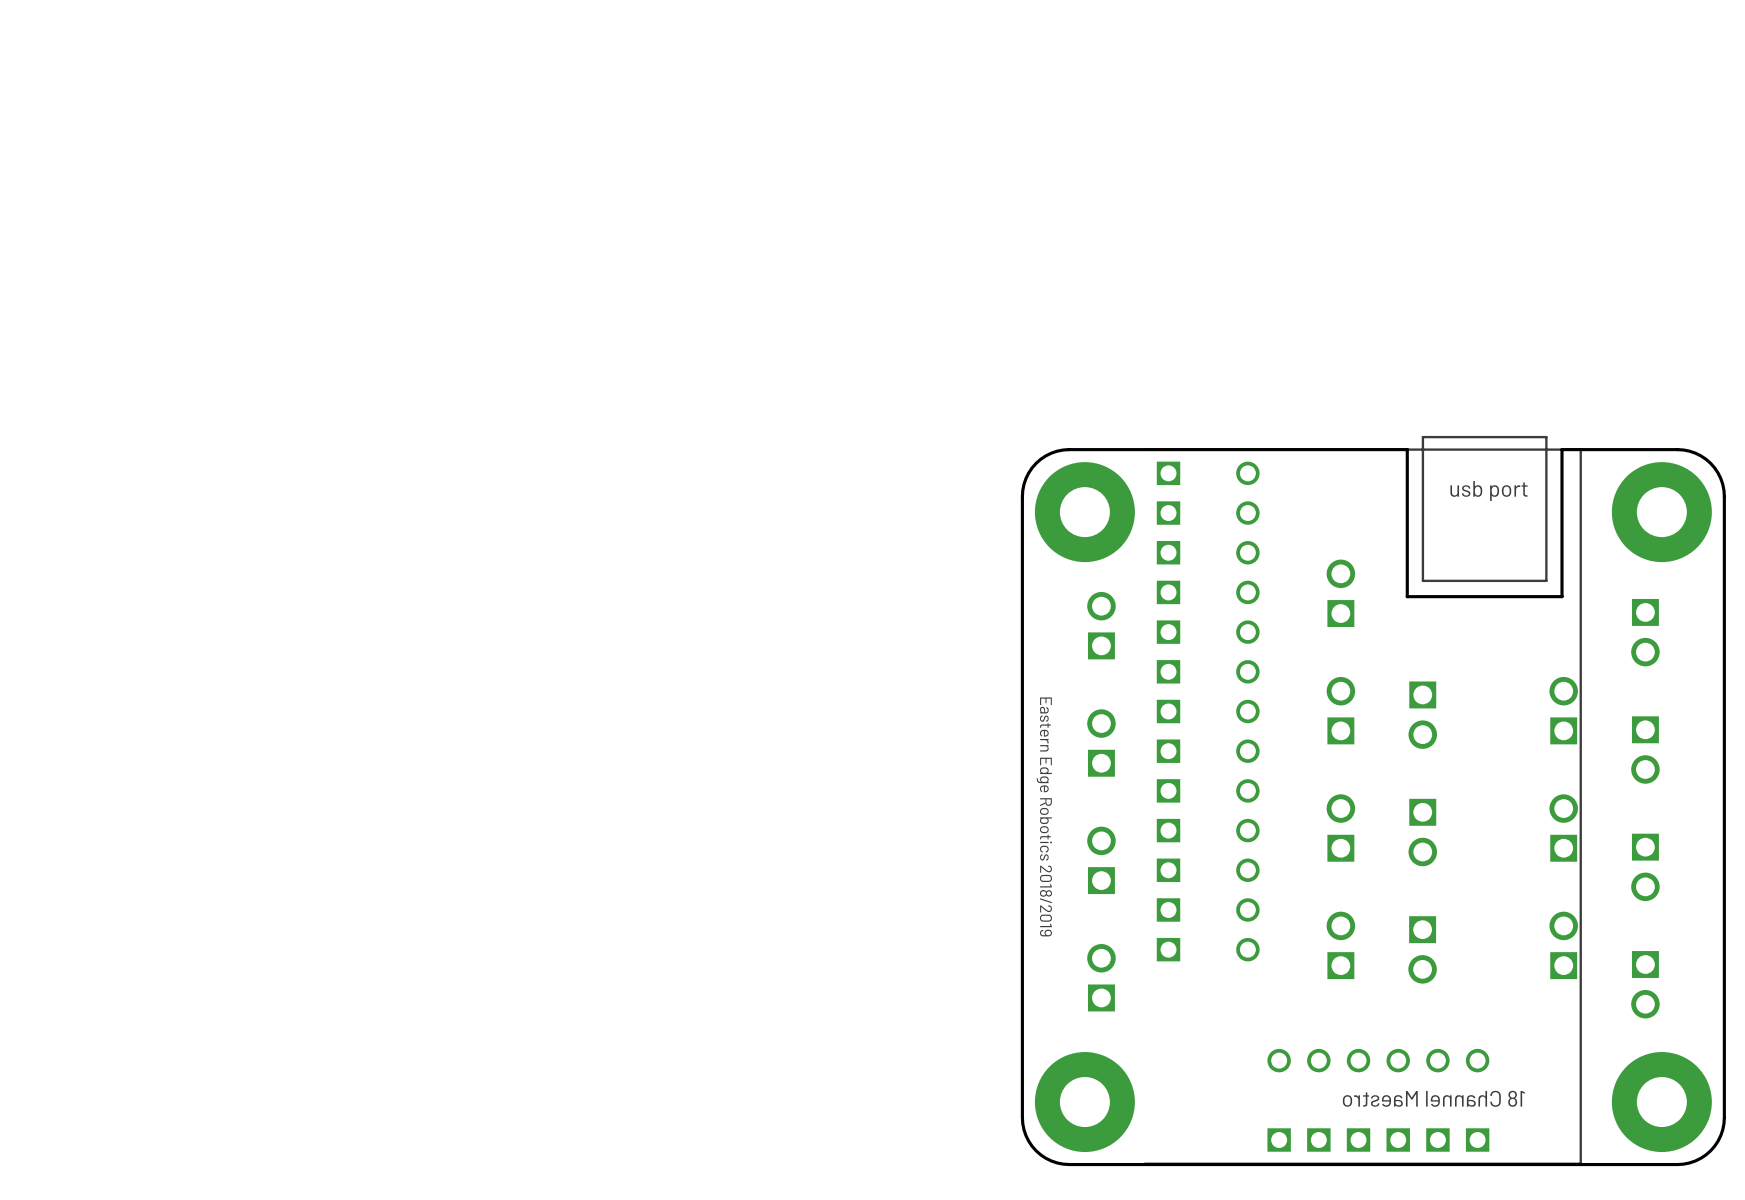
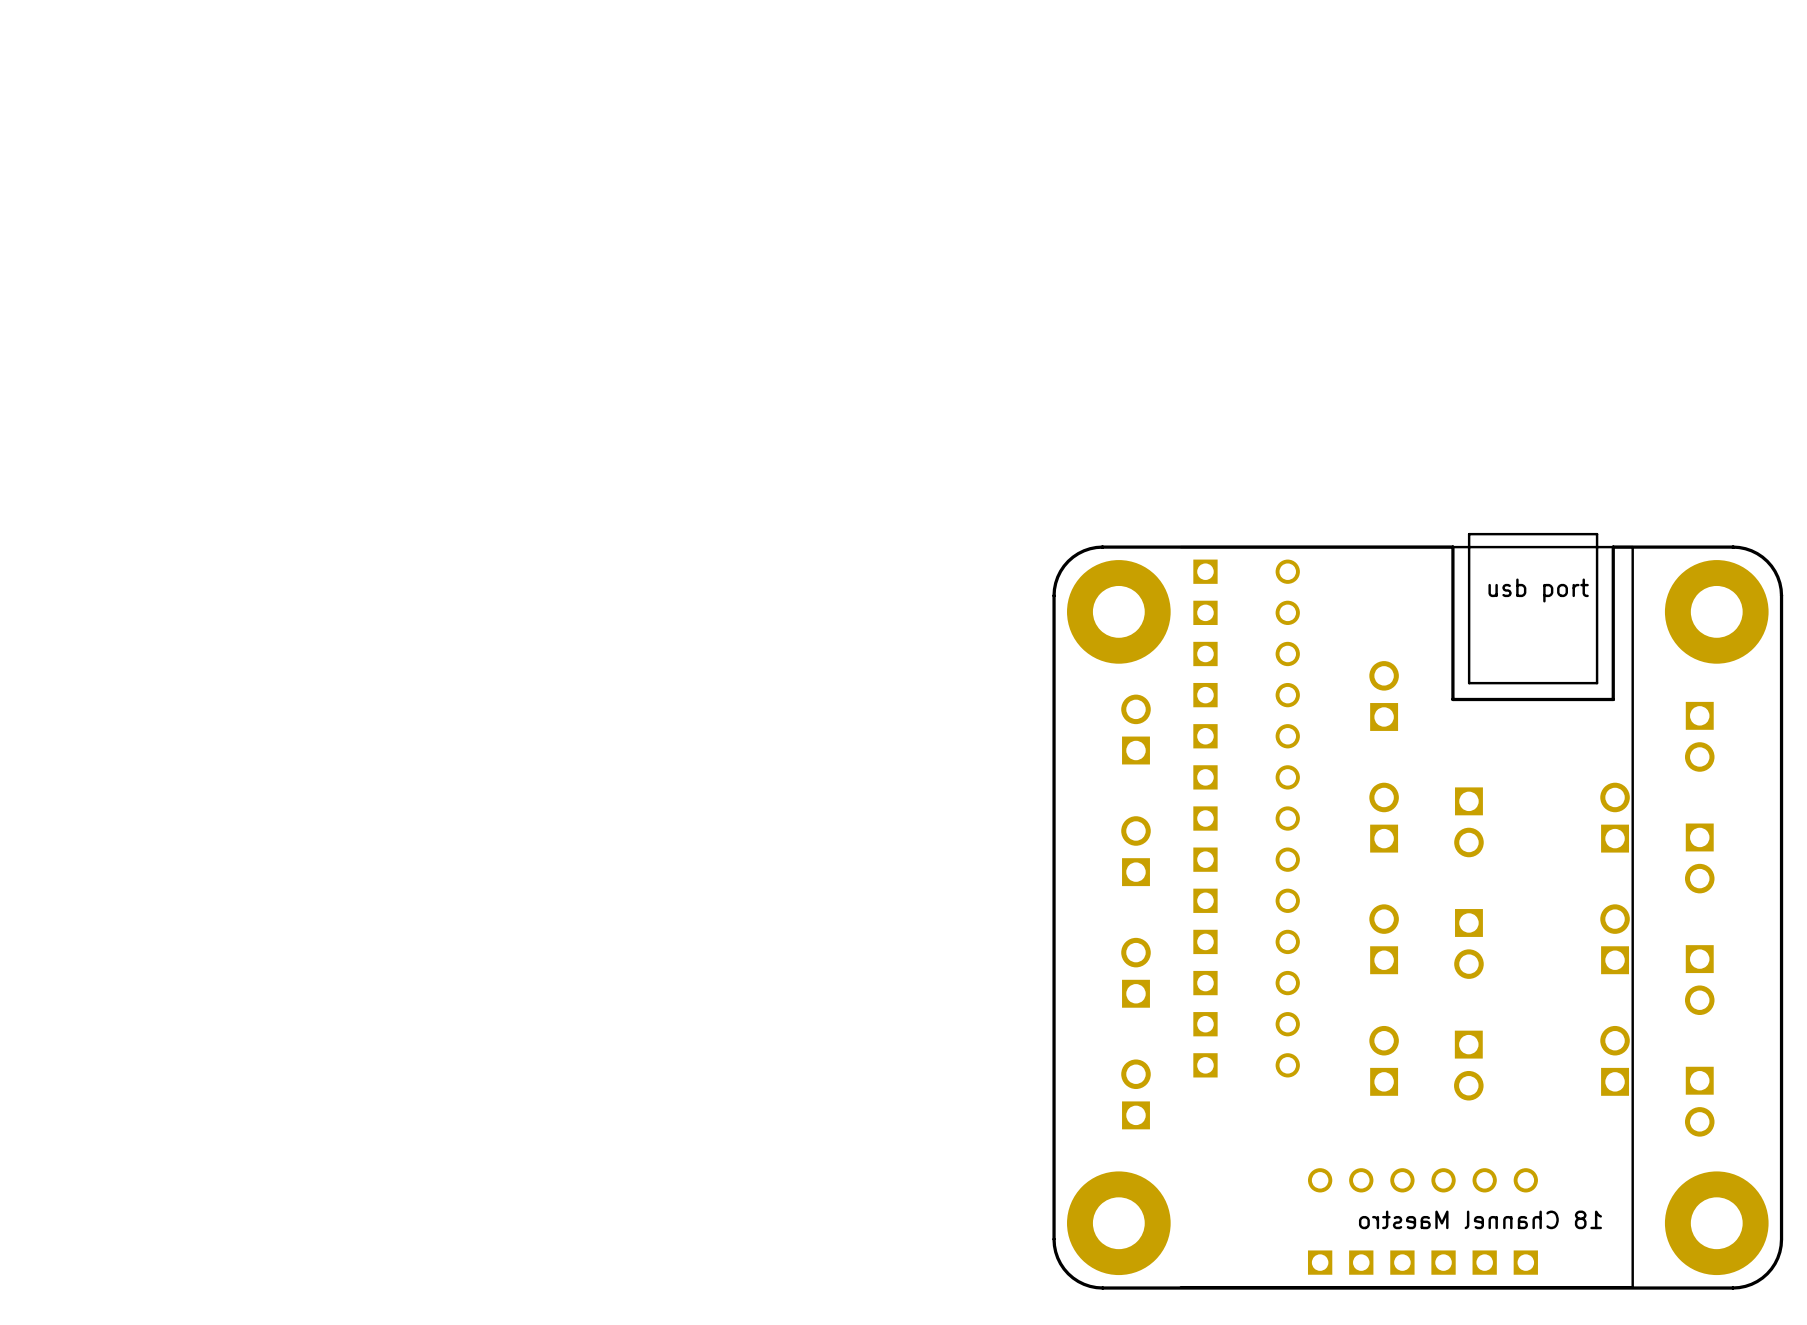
text: Eastern Edge Robotics 2018/2019 (1044, 816) -> none

